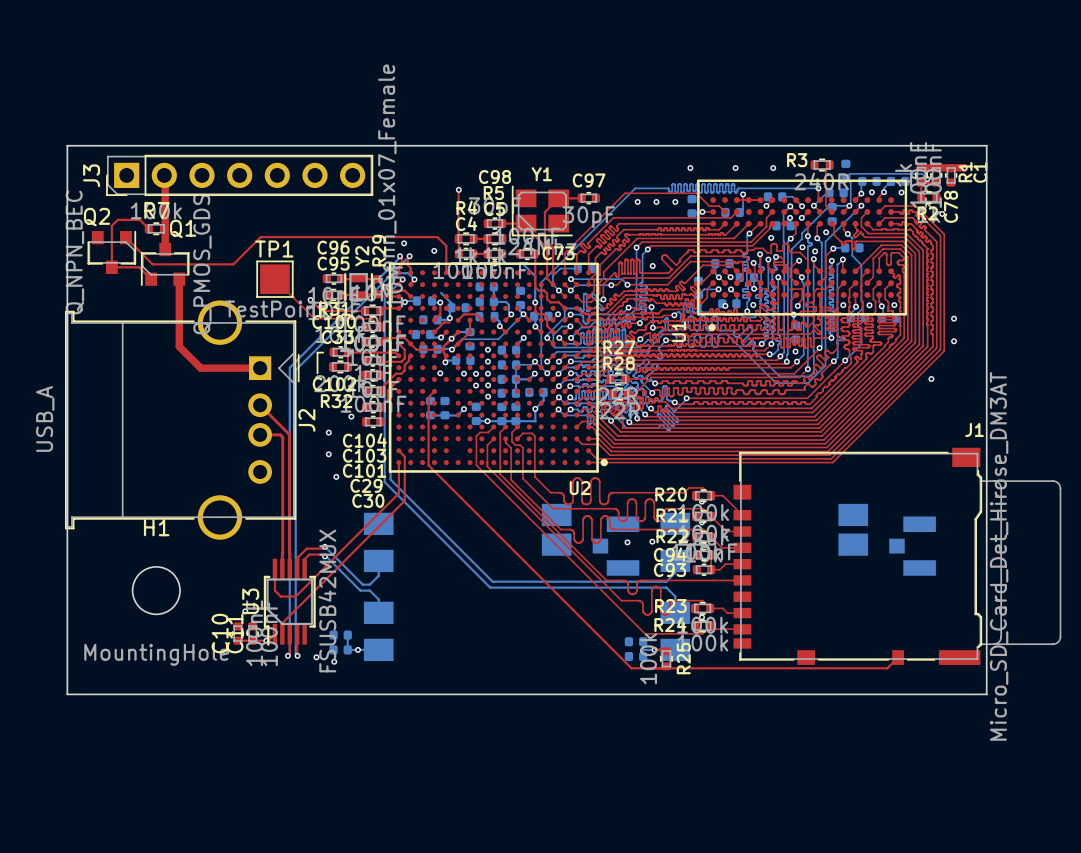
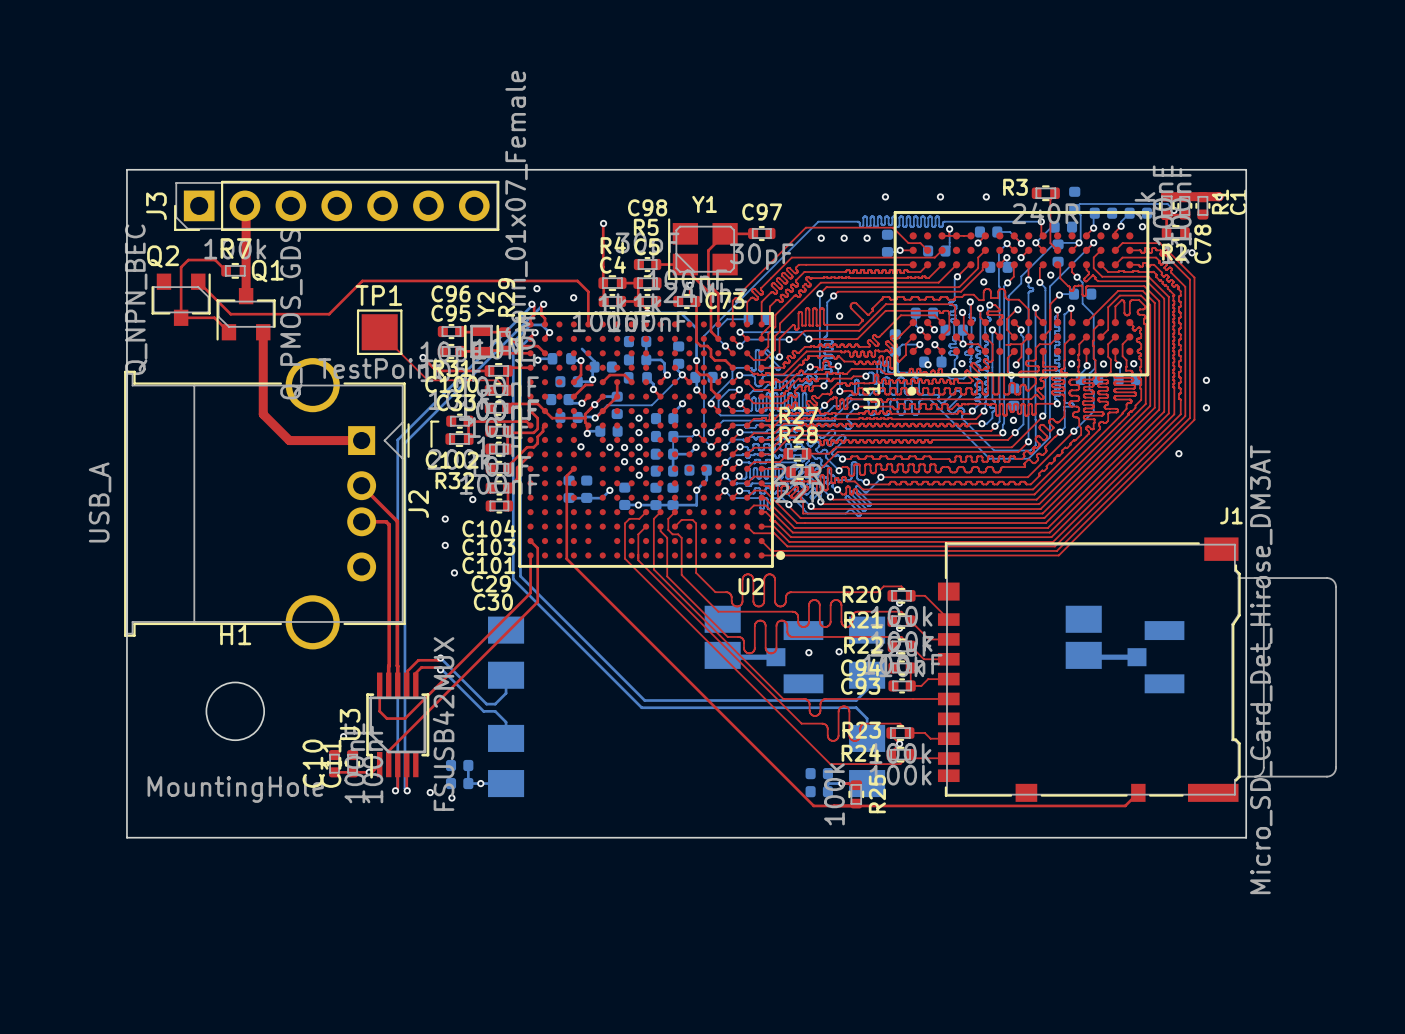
via: (802, 247) -> none
via: (815, 251) -> none
bottom track: none -> (722, 655) (724, 657) (775, 657)
bottom track: none -> (1083, 655) (1085, 657) (1136, 657)

